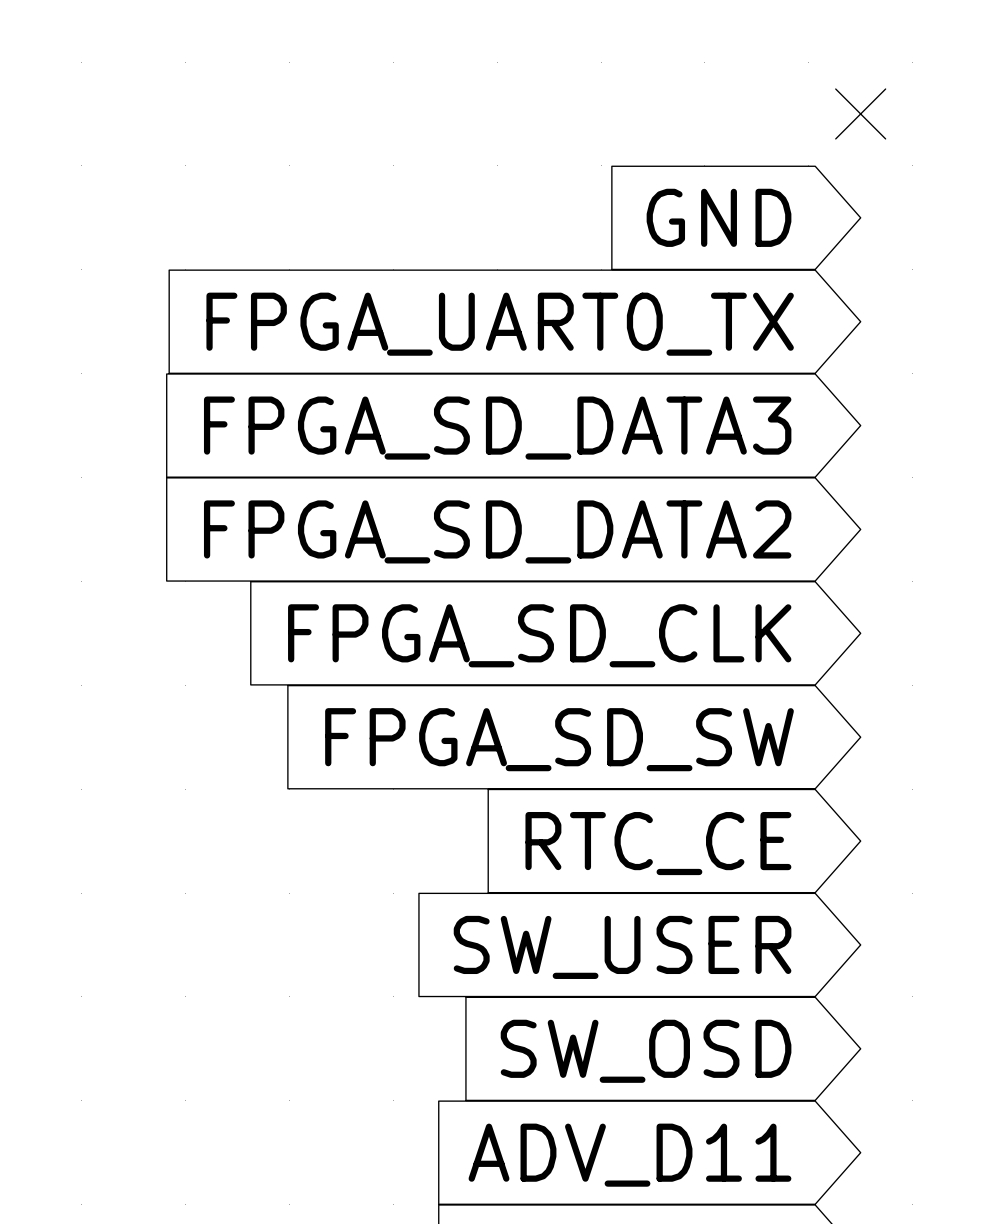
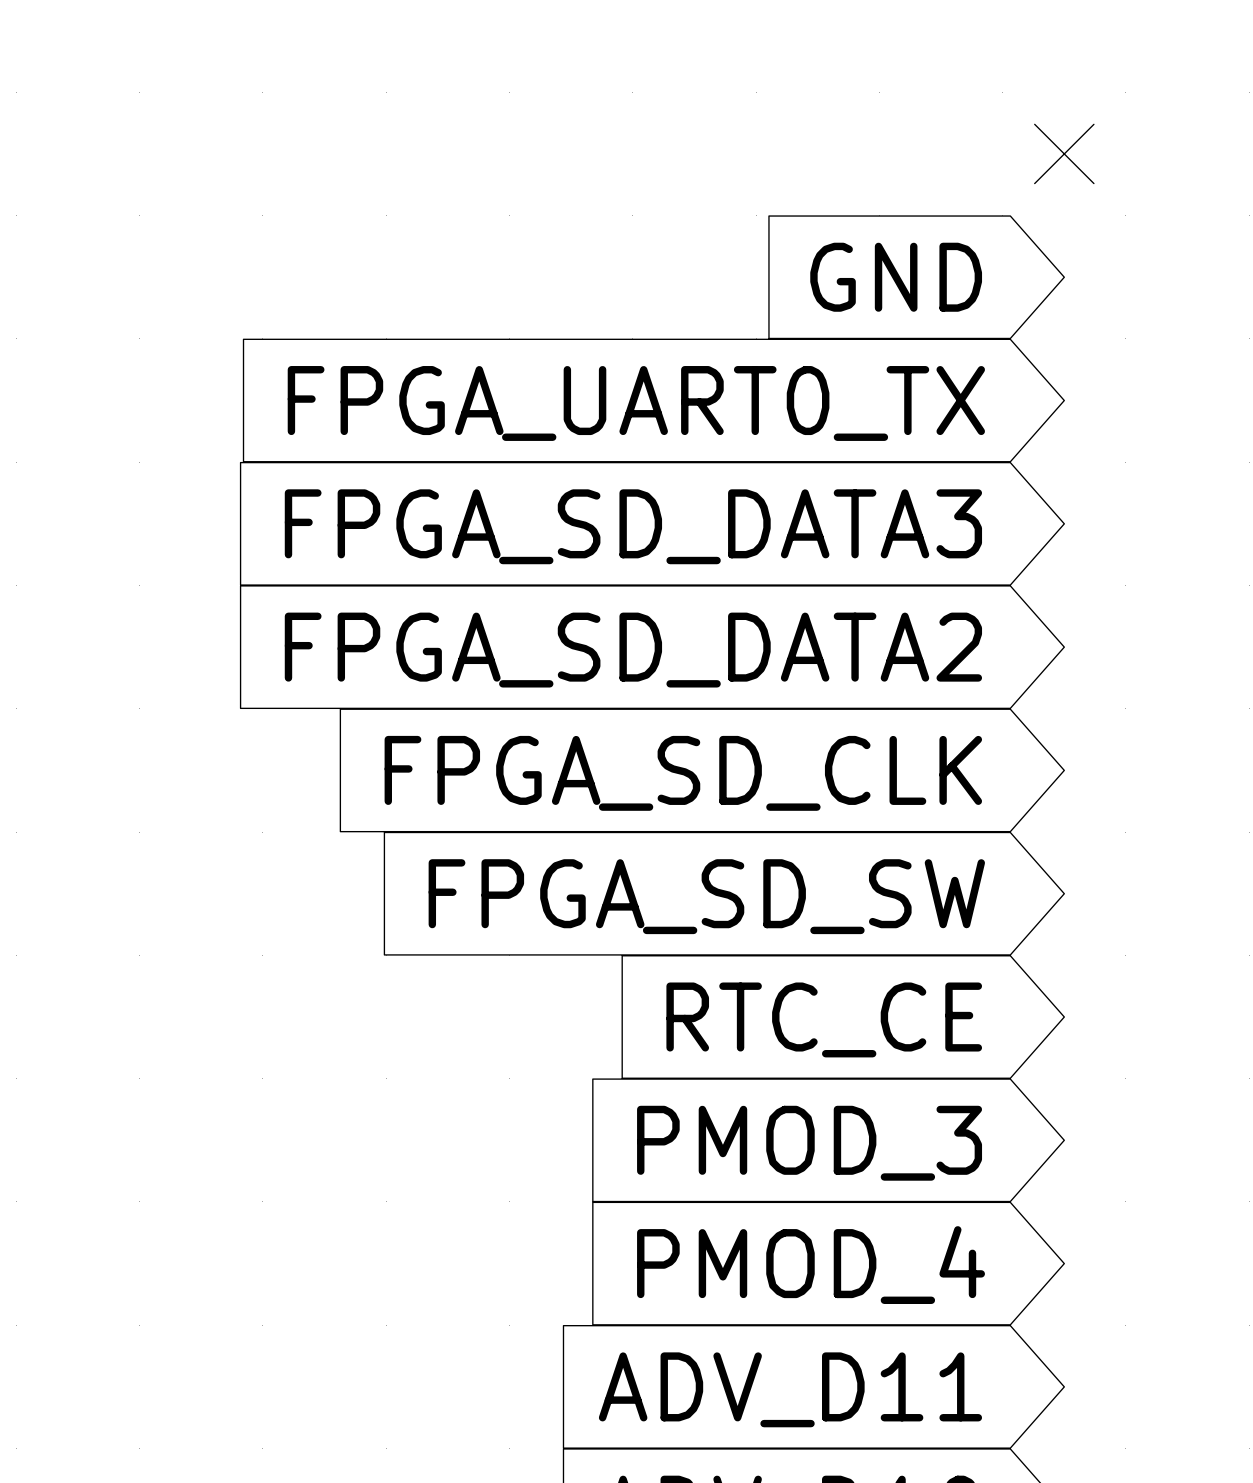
global label: SW_USER (622, 947) -> PMOD_3 (809, 1143)
global label: SW_OSD (646, 1051) -> PMOD_4 (811, 1265)

